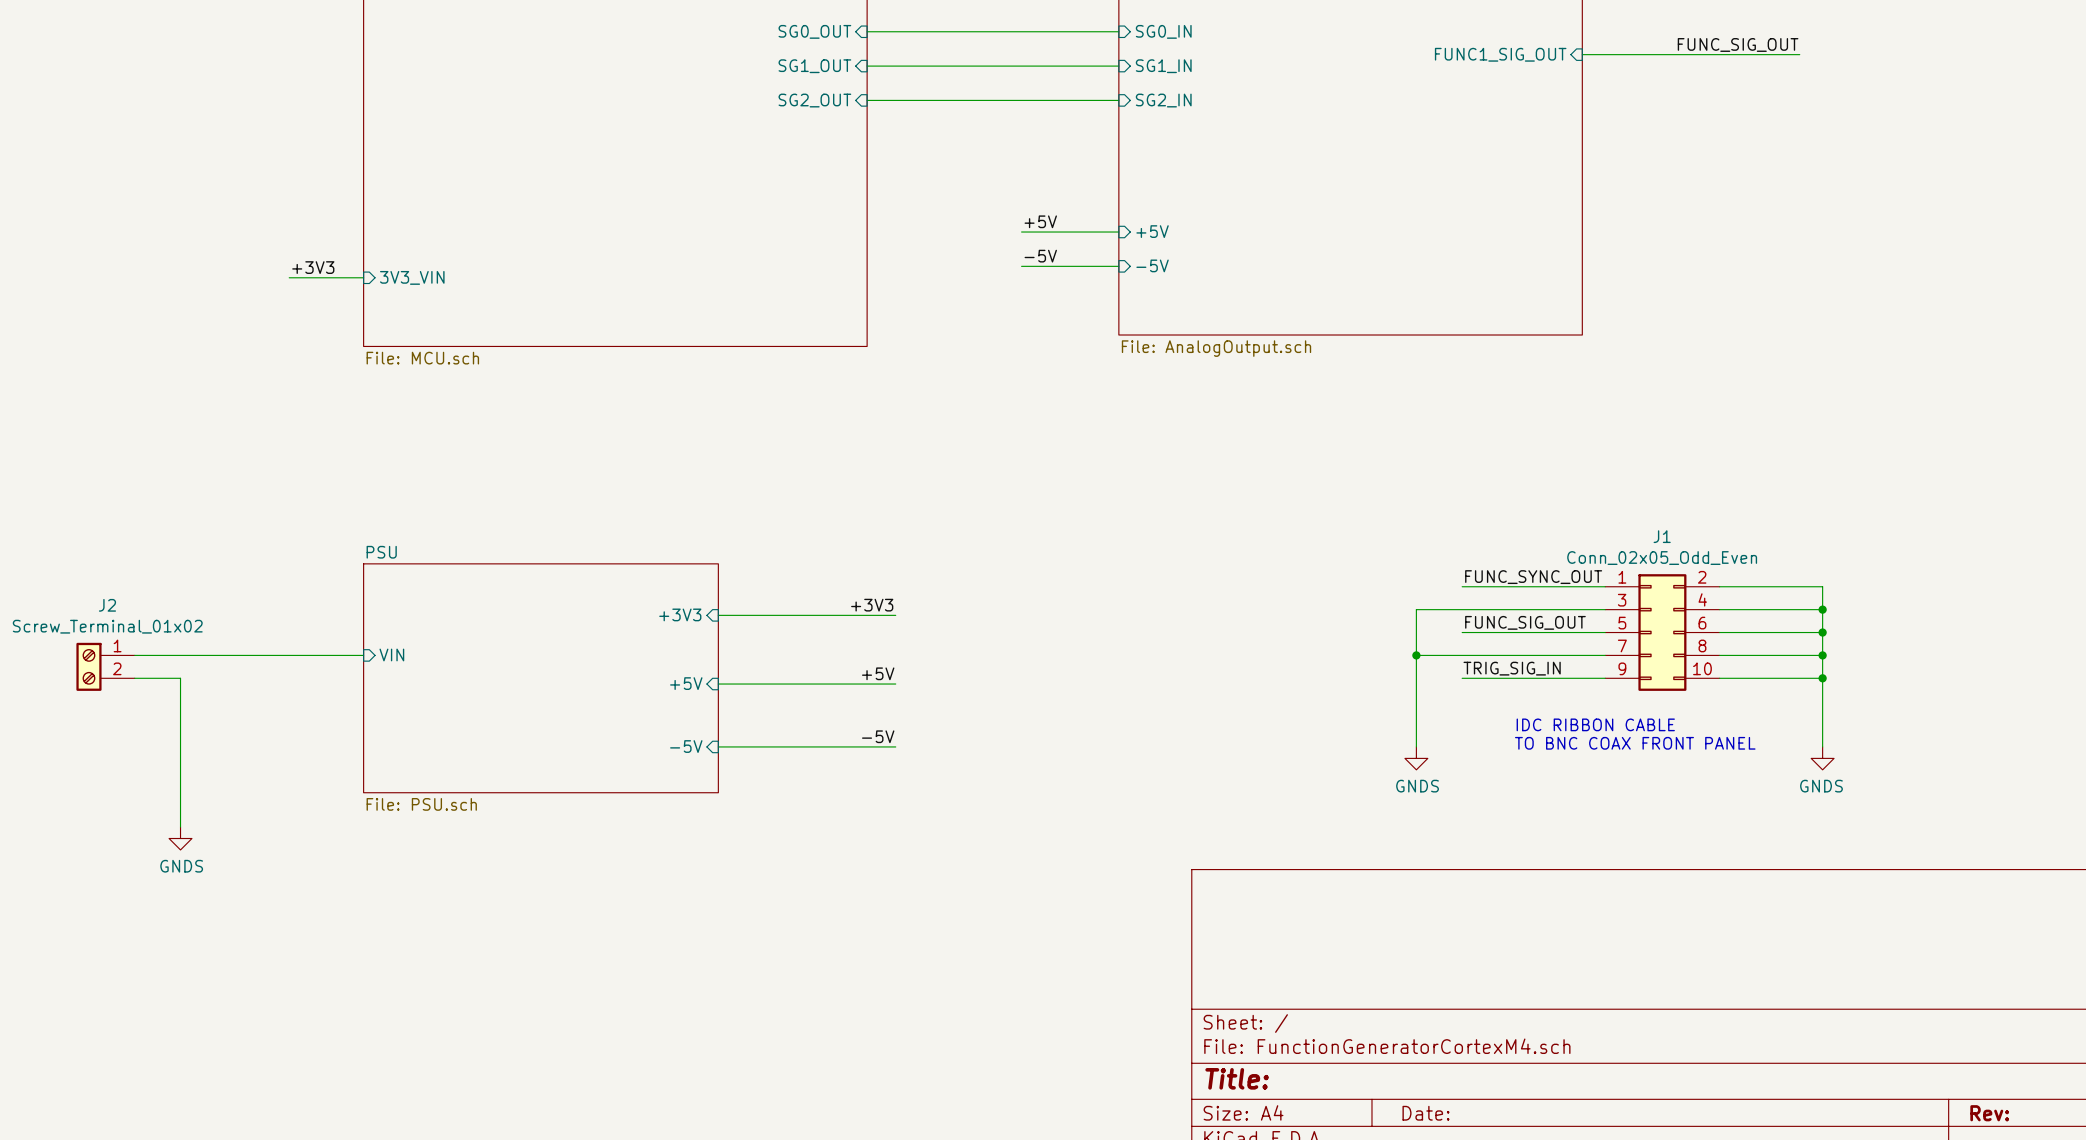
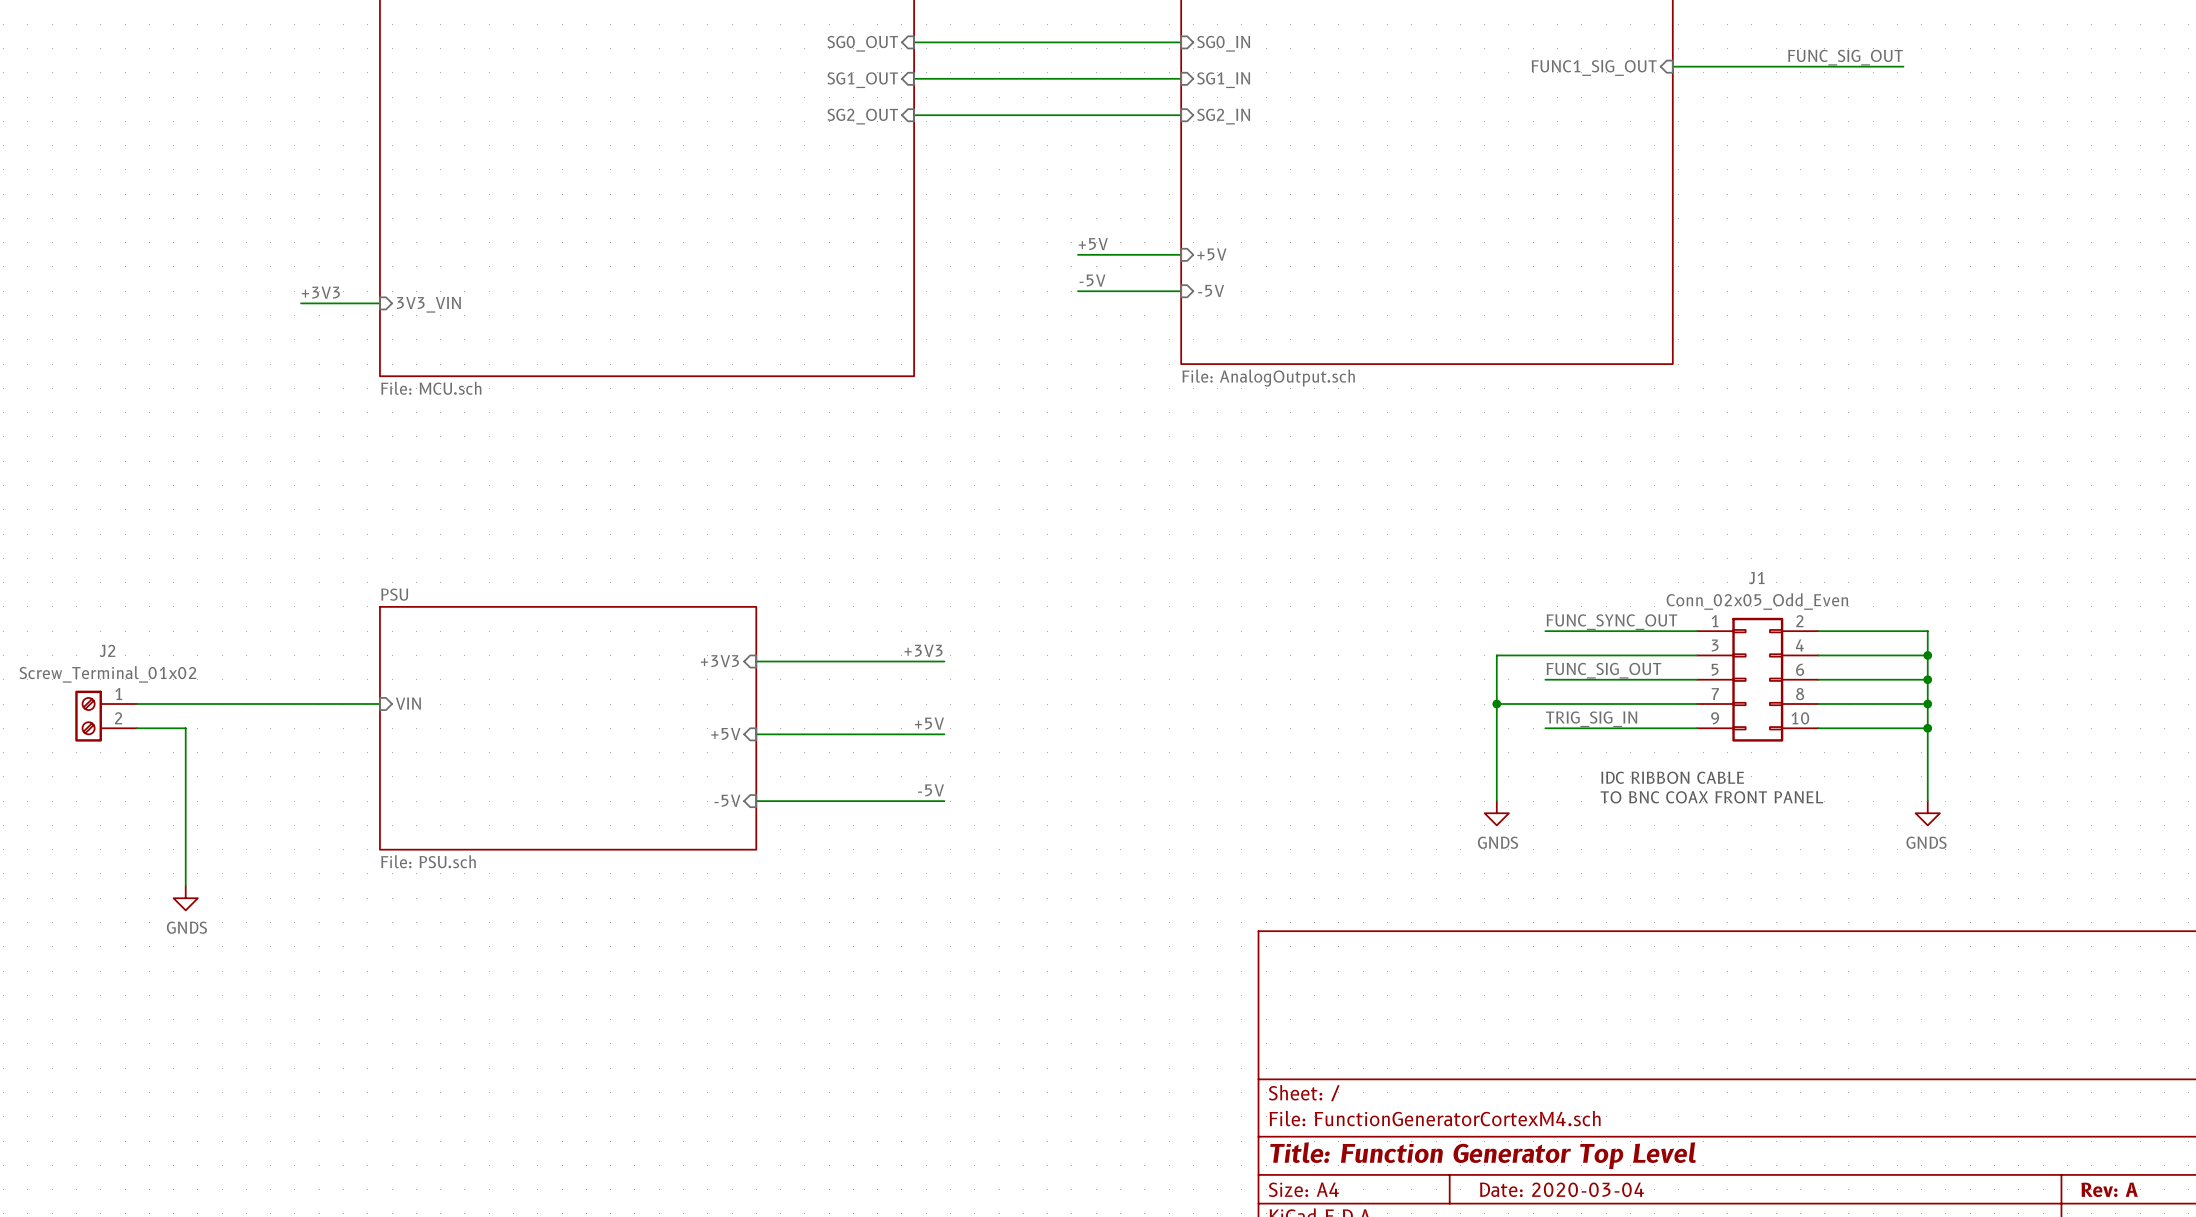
title block: Title: (1237, 1078) -> Title: Function Generator Top Level (1482, 1155)
title block: Date: (1425, 1113) -> Date: 2020-03-04 (1561, 1189)
title block: Rev: (1989, 1113) -> Rev: A (2109, 1189)

